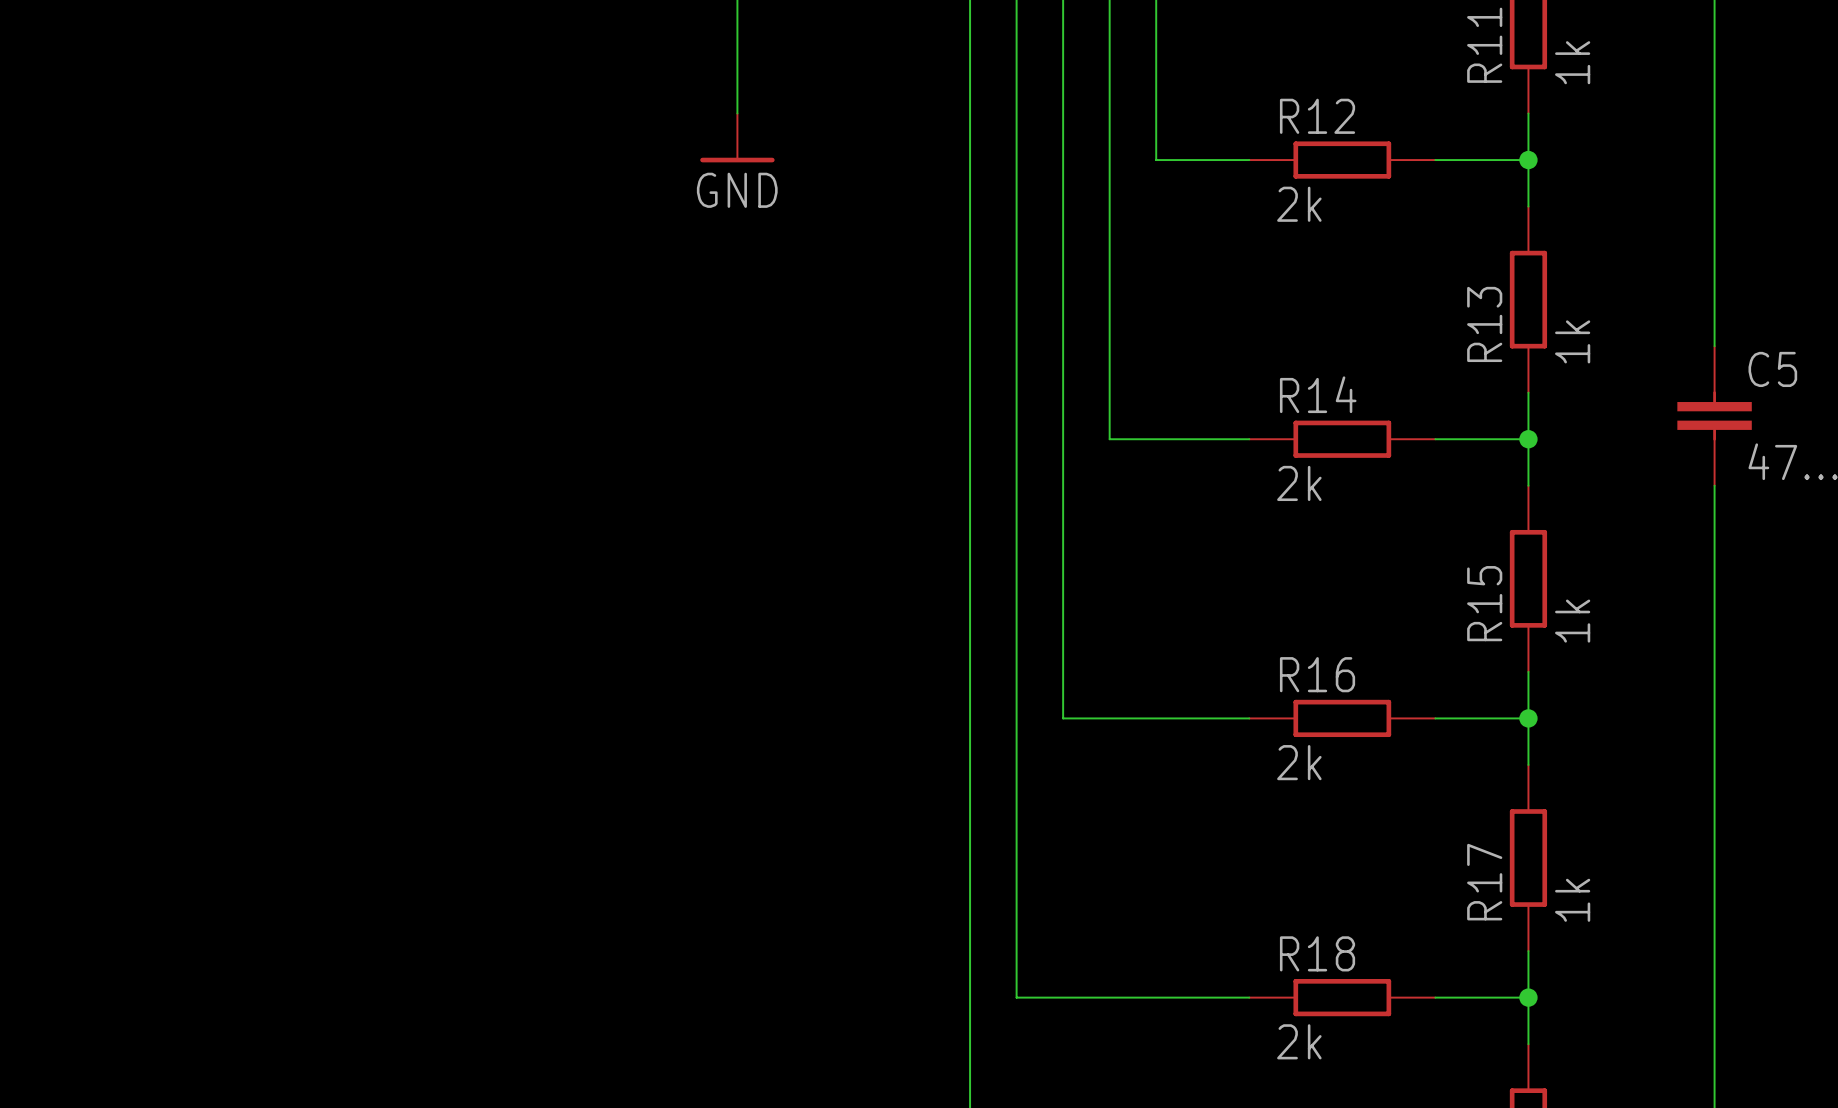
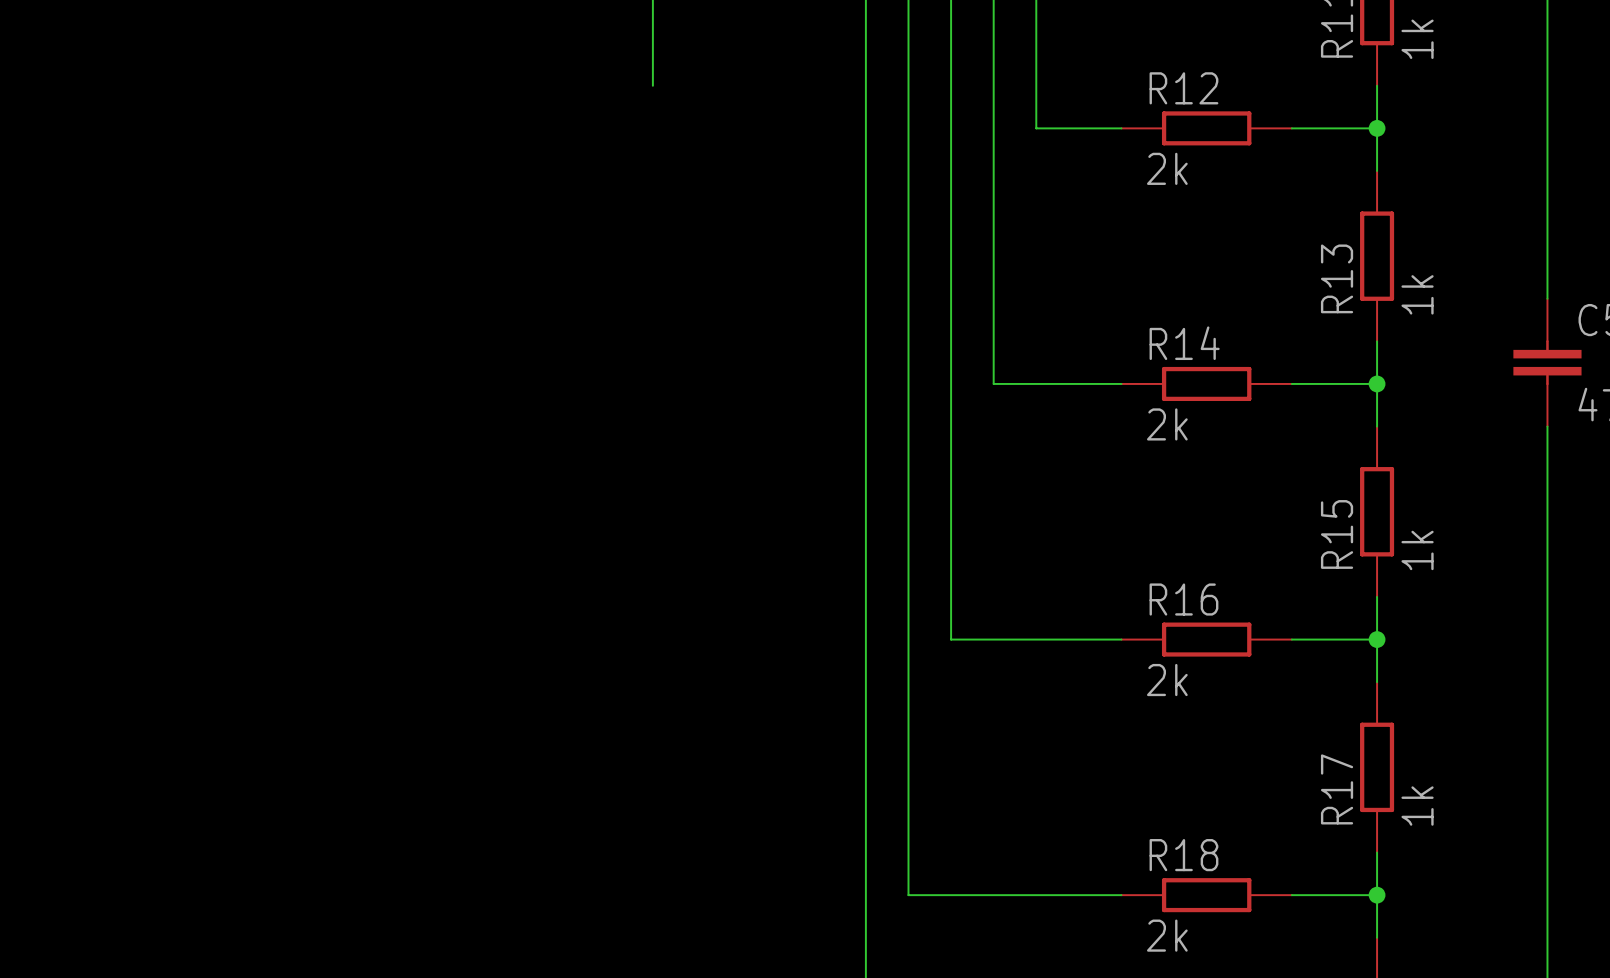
power symbol: GND (737, 137) -> none

